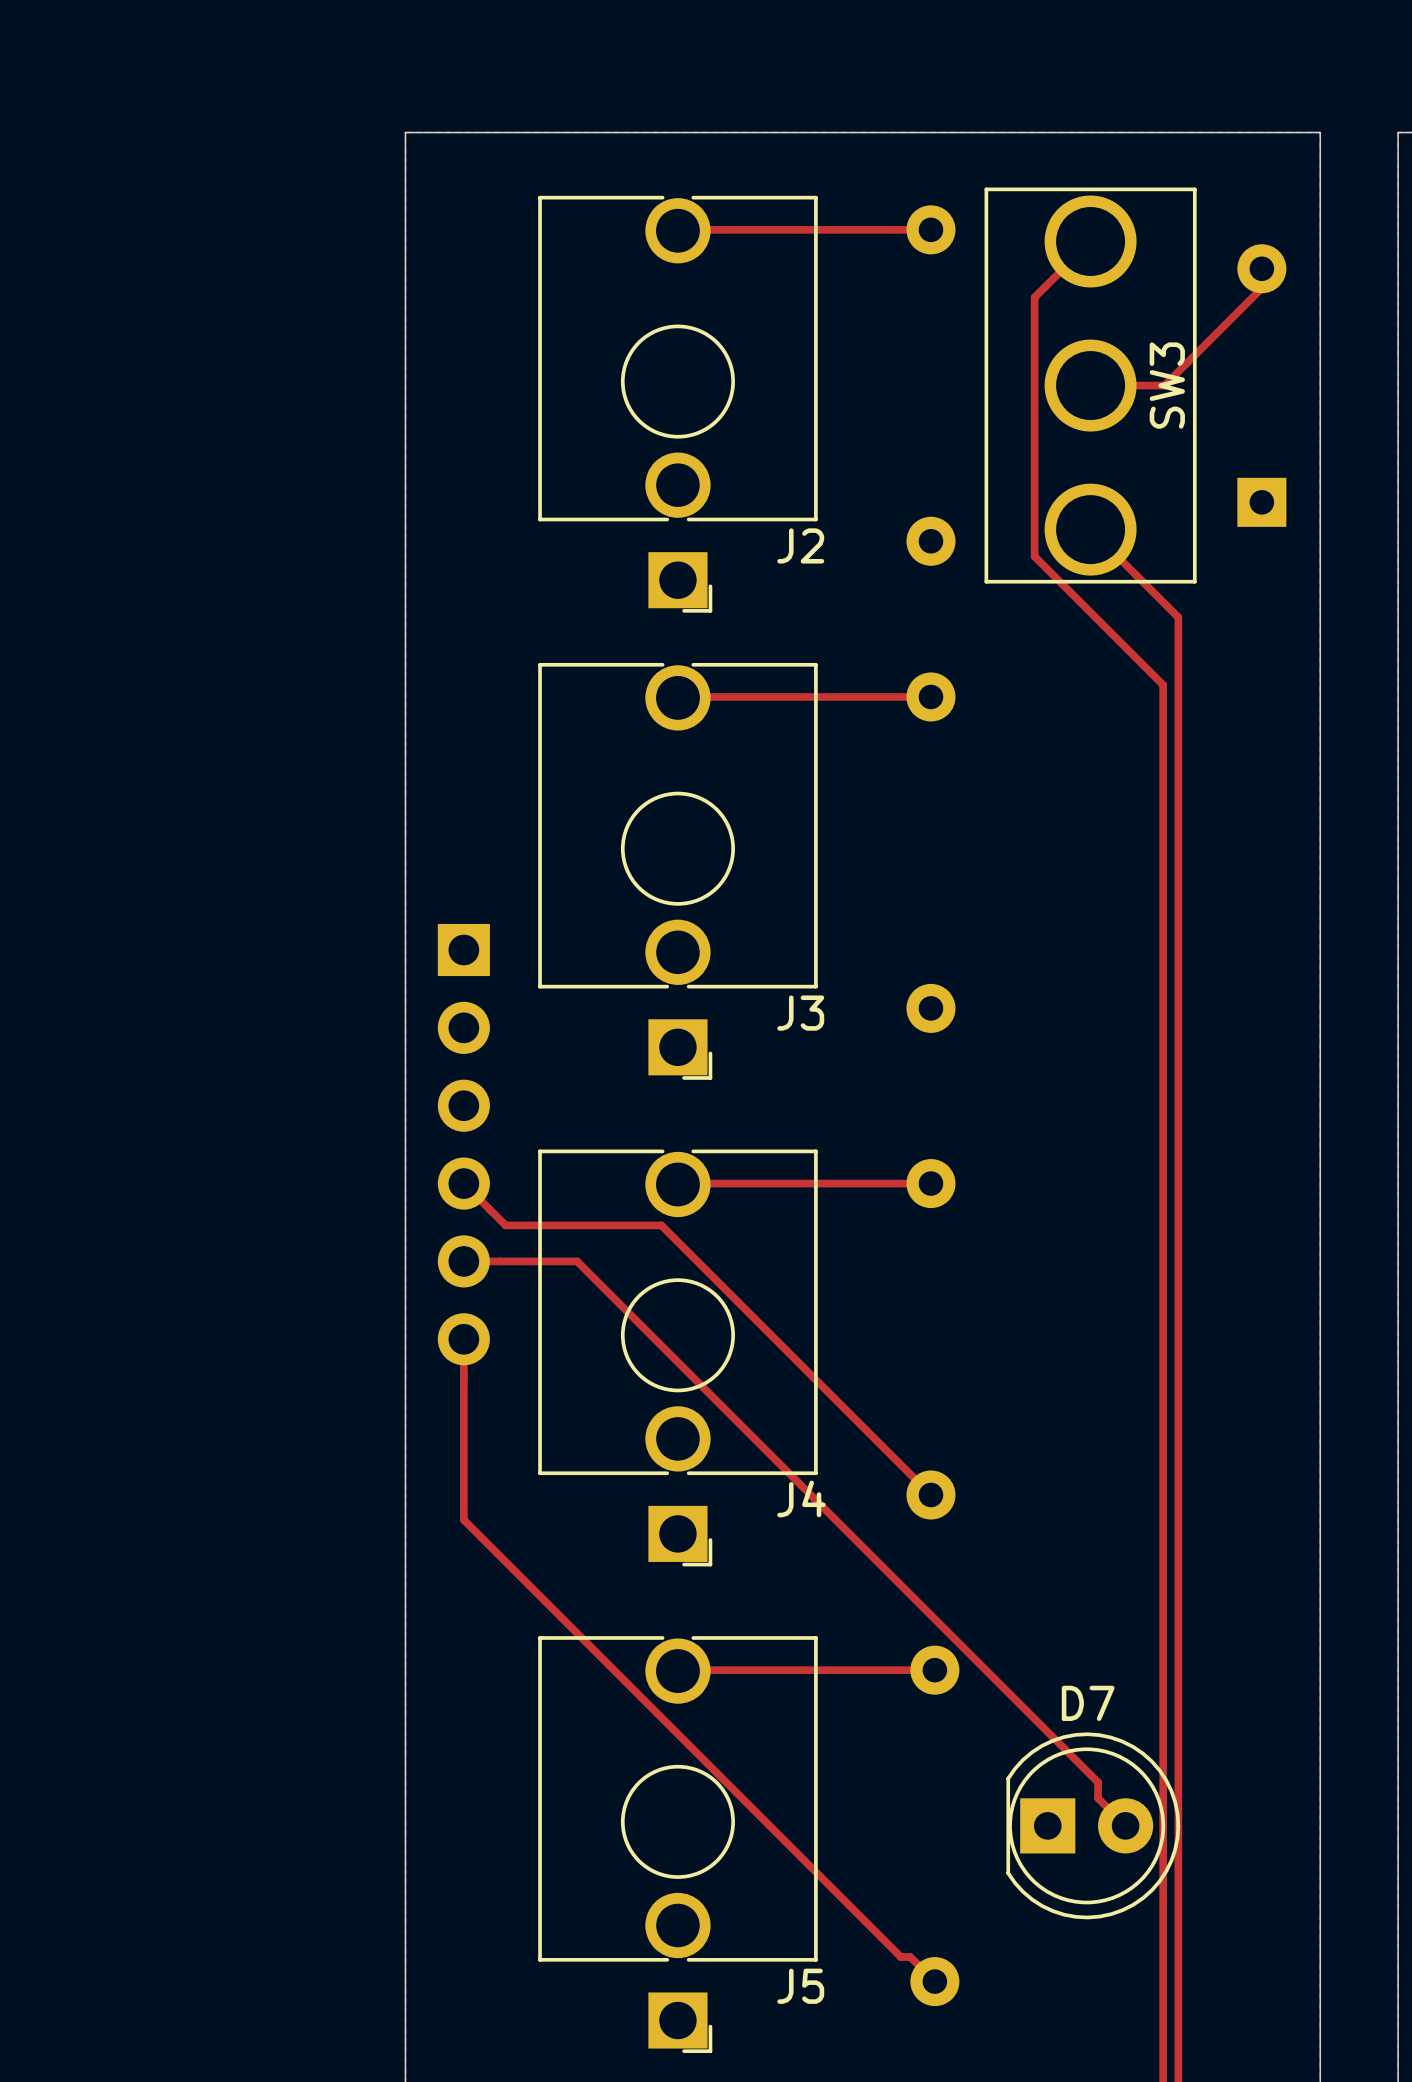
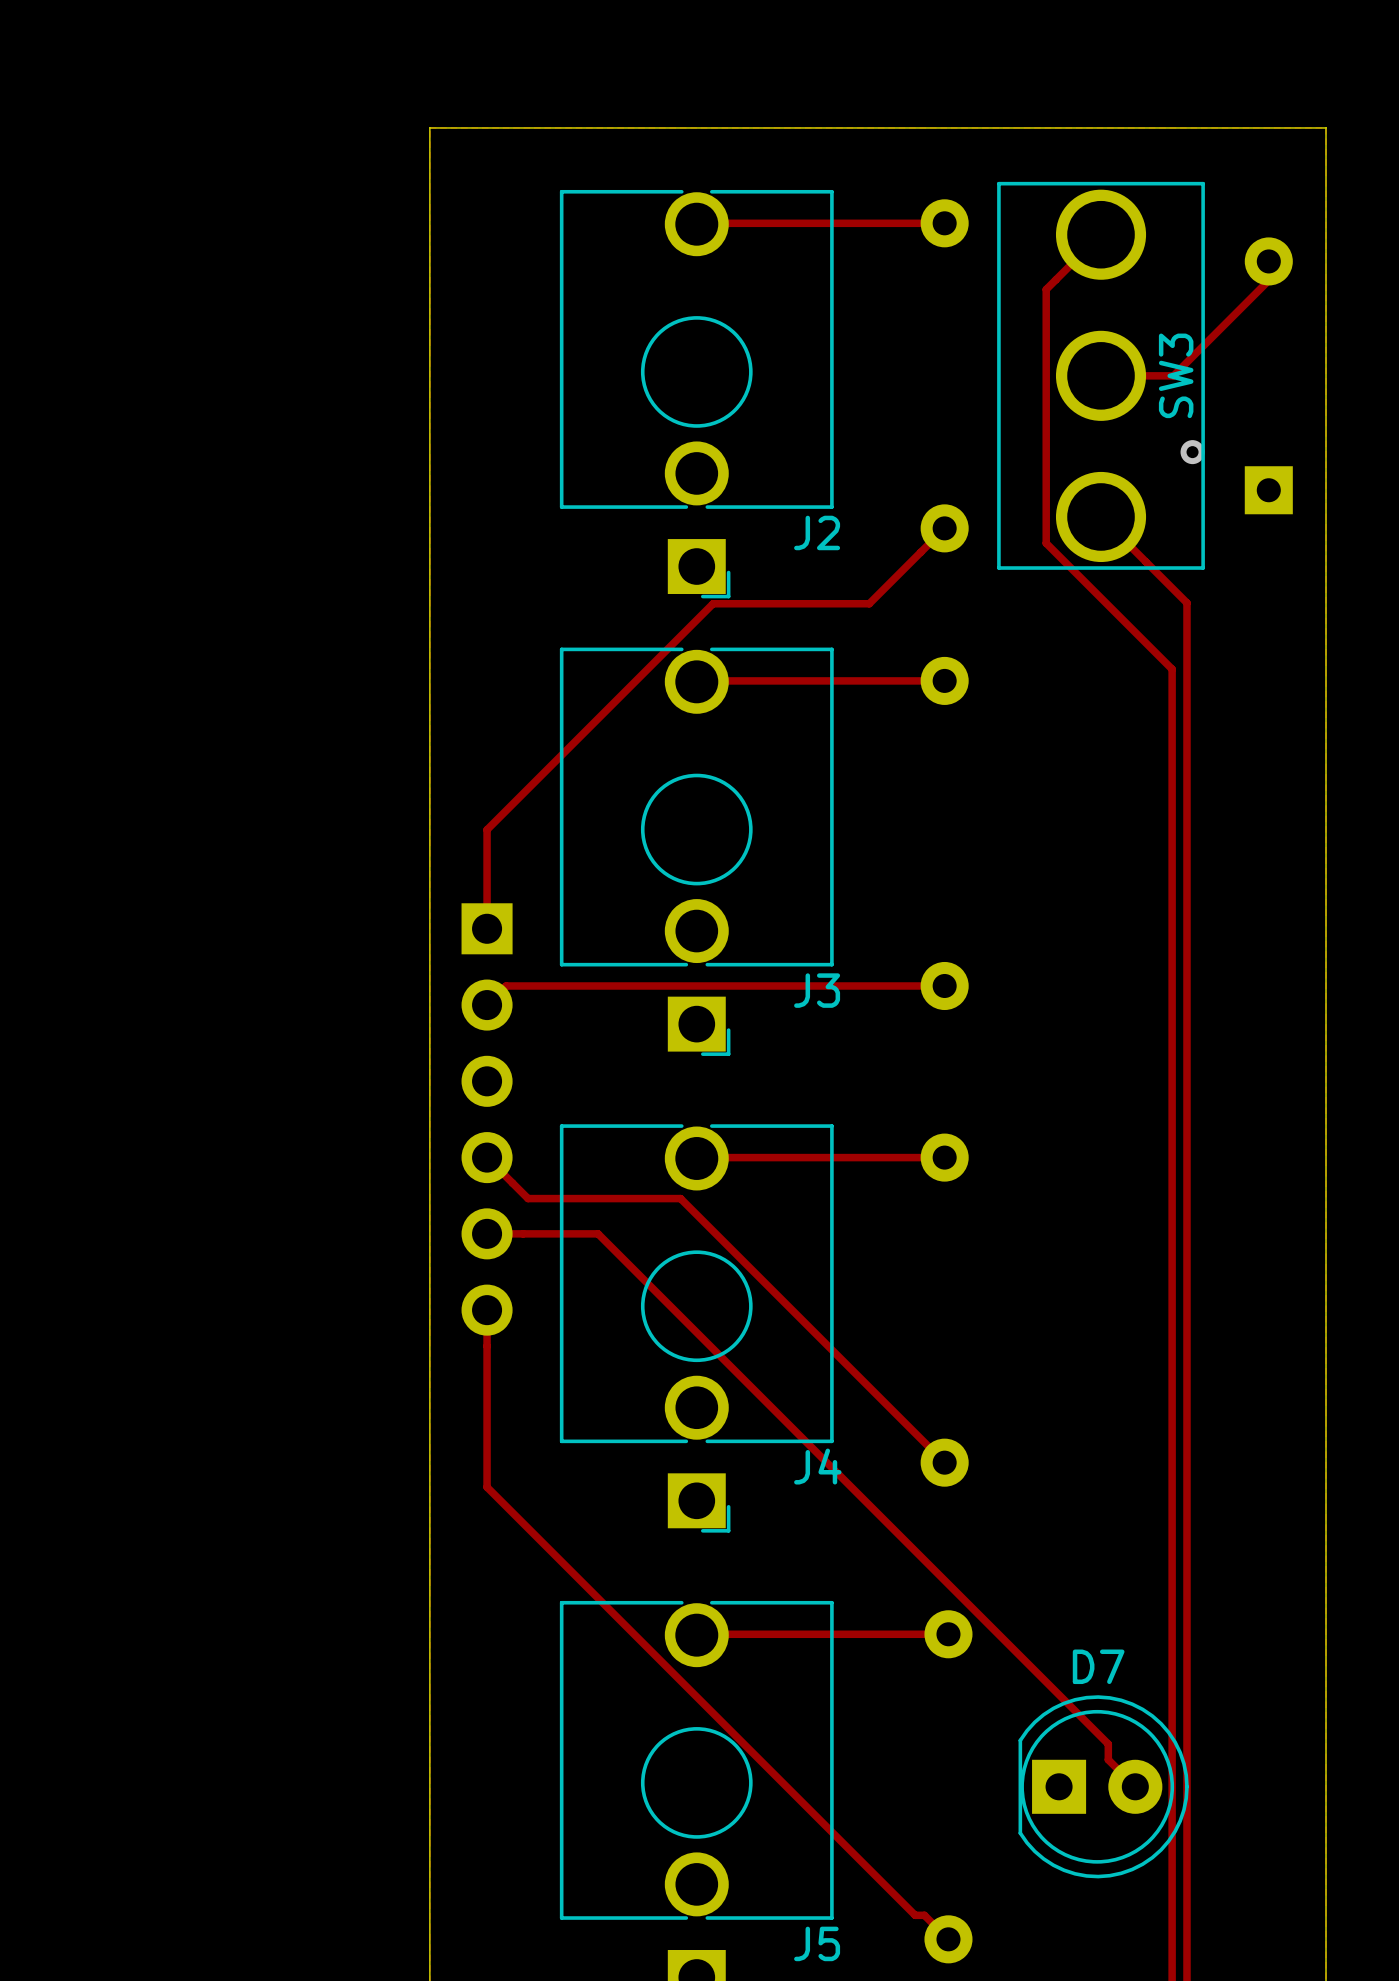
via: none -> (1192, 452)
track: none -> (944, 528) (869, 603) (713, 603) (487, 829) (487, 928)
track: none -> (944, 985) (506, 985) (487, 1005)

